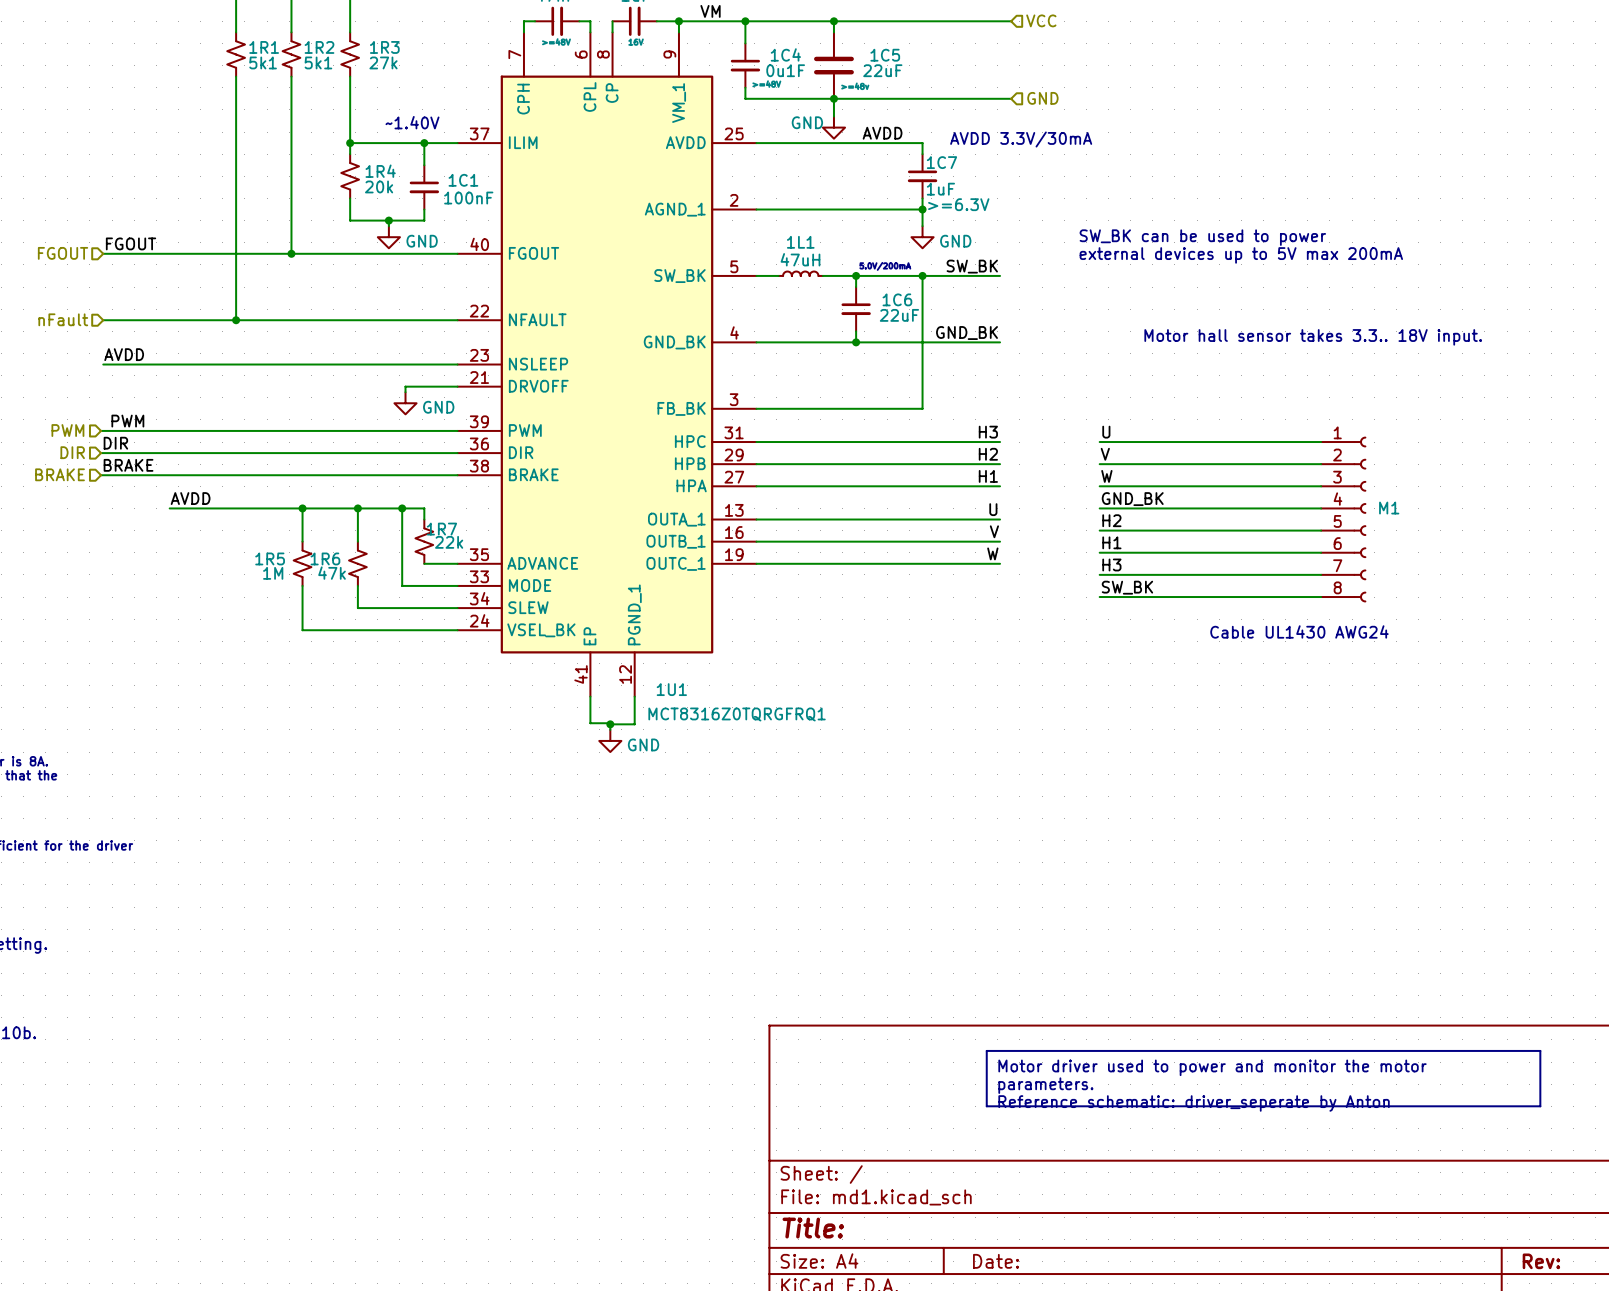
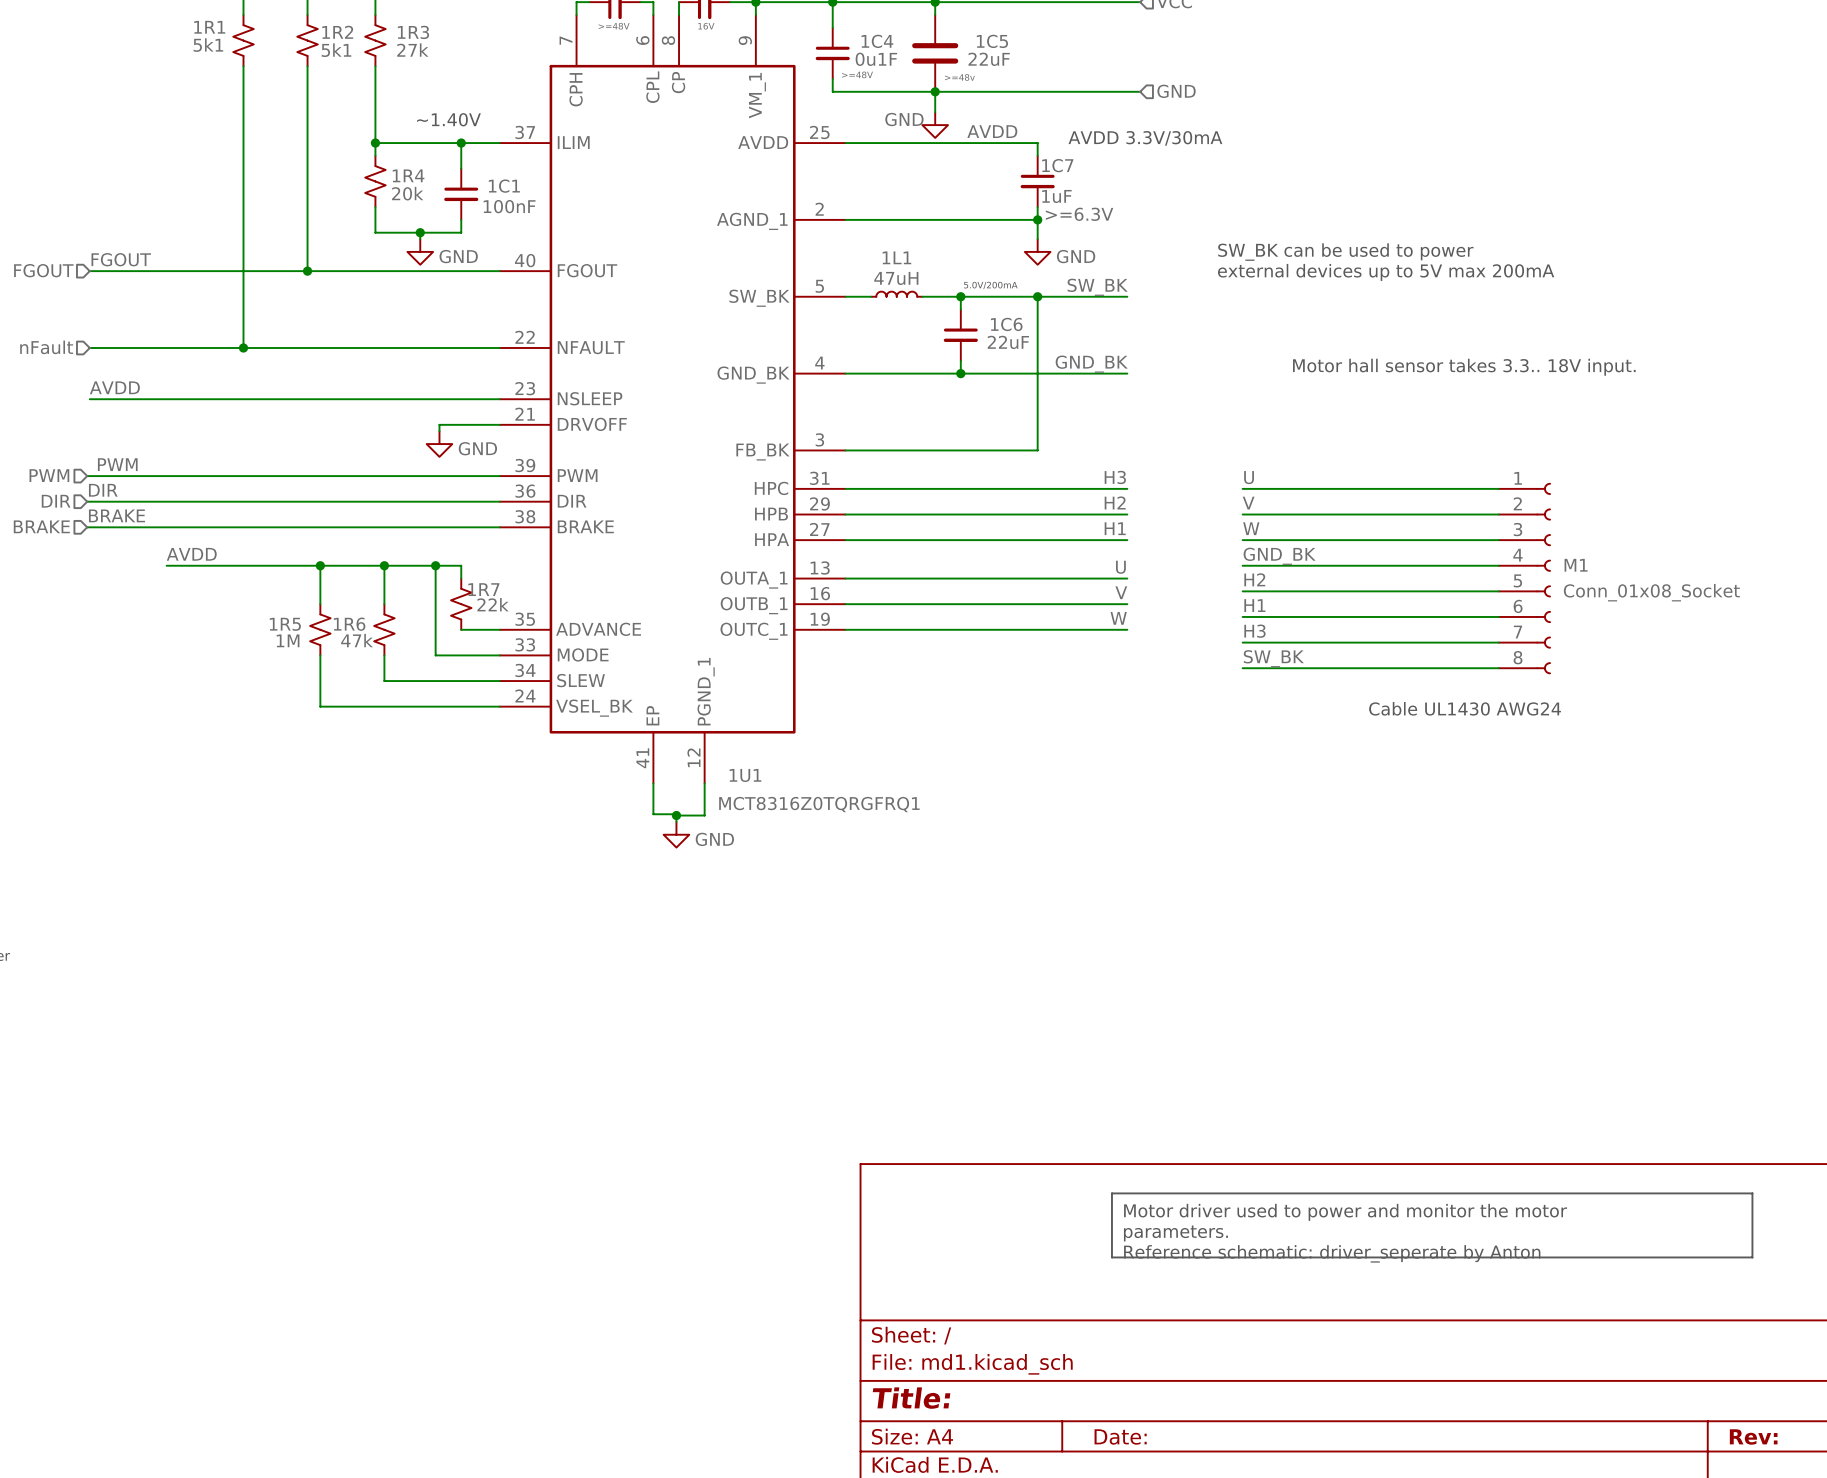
1R1 name position: 1R1 (264, 47) -> 1R1 (209, 27)
1R1 value position: 5k1 (263, 62) -> 5k1 (208, 45)
M1 value: none -> Conn_01x08_Socket (1651, 592)

